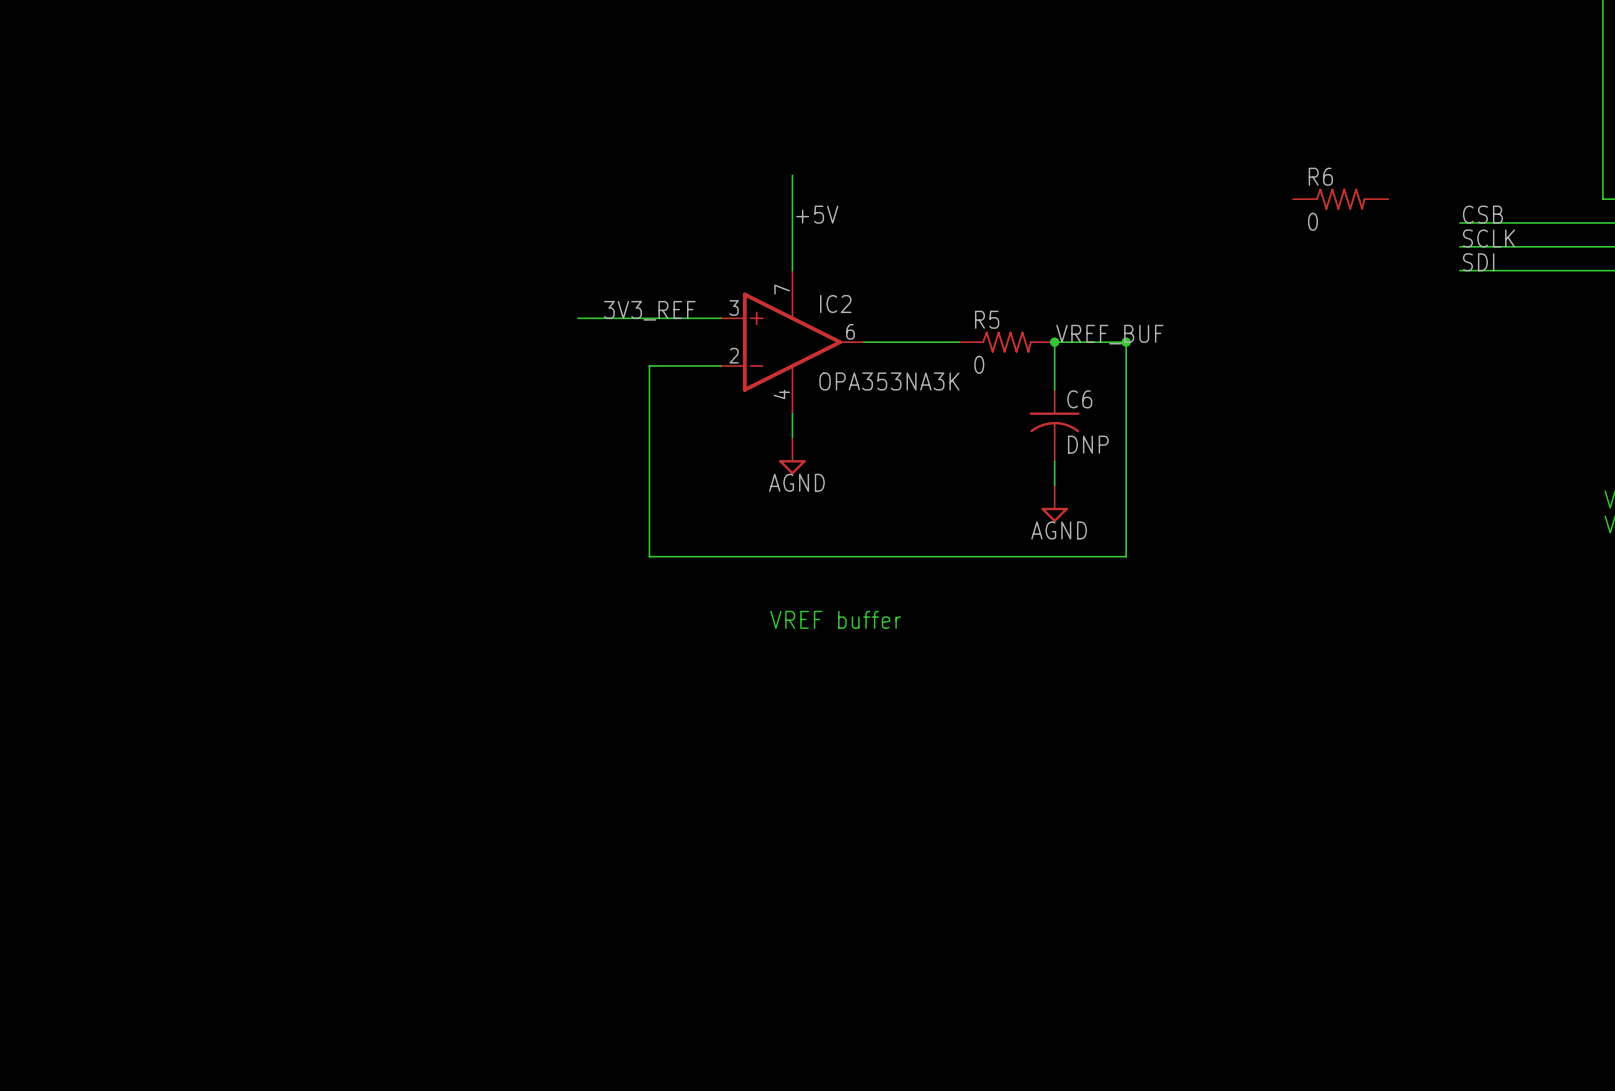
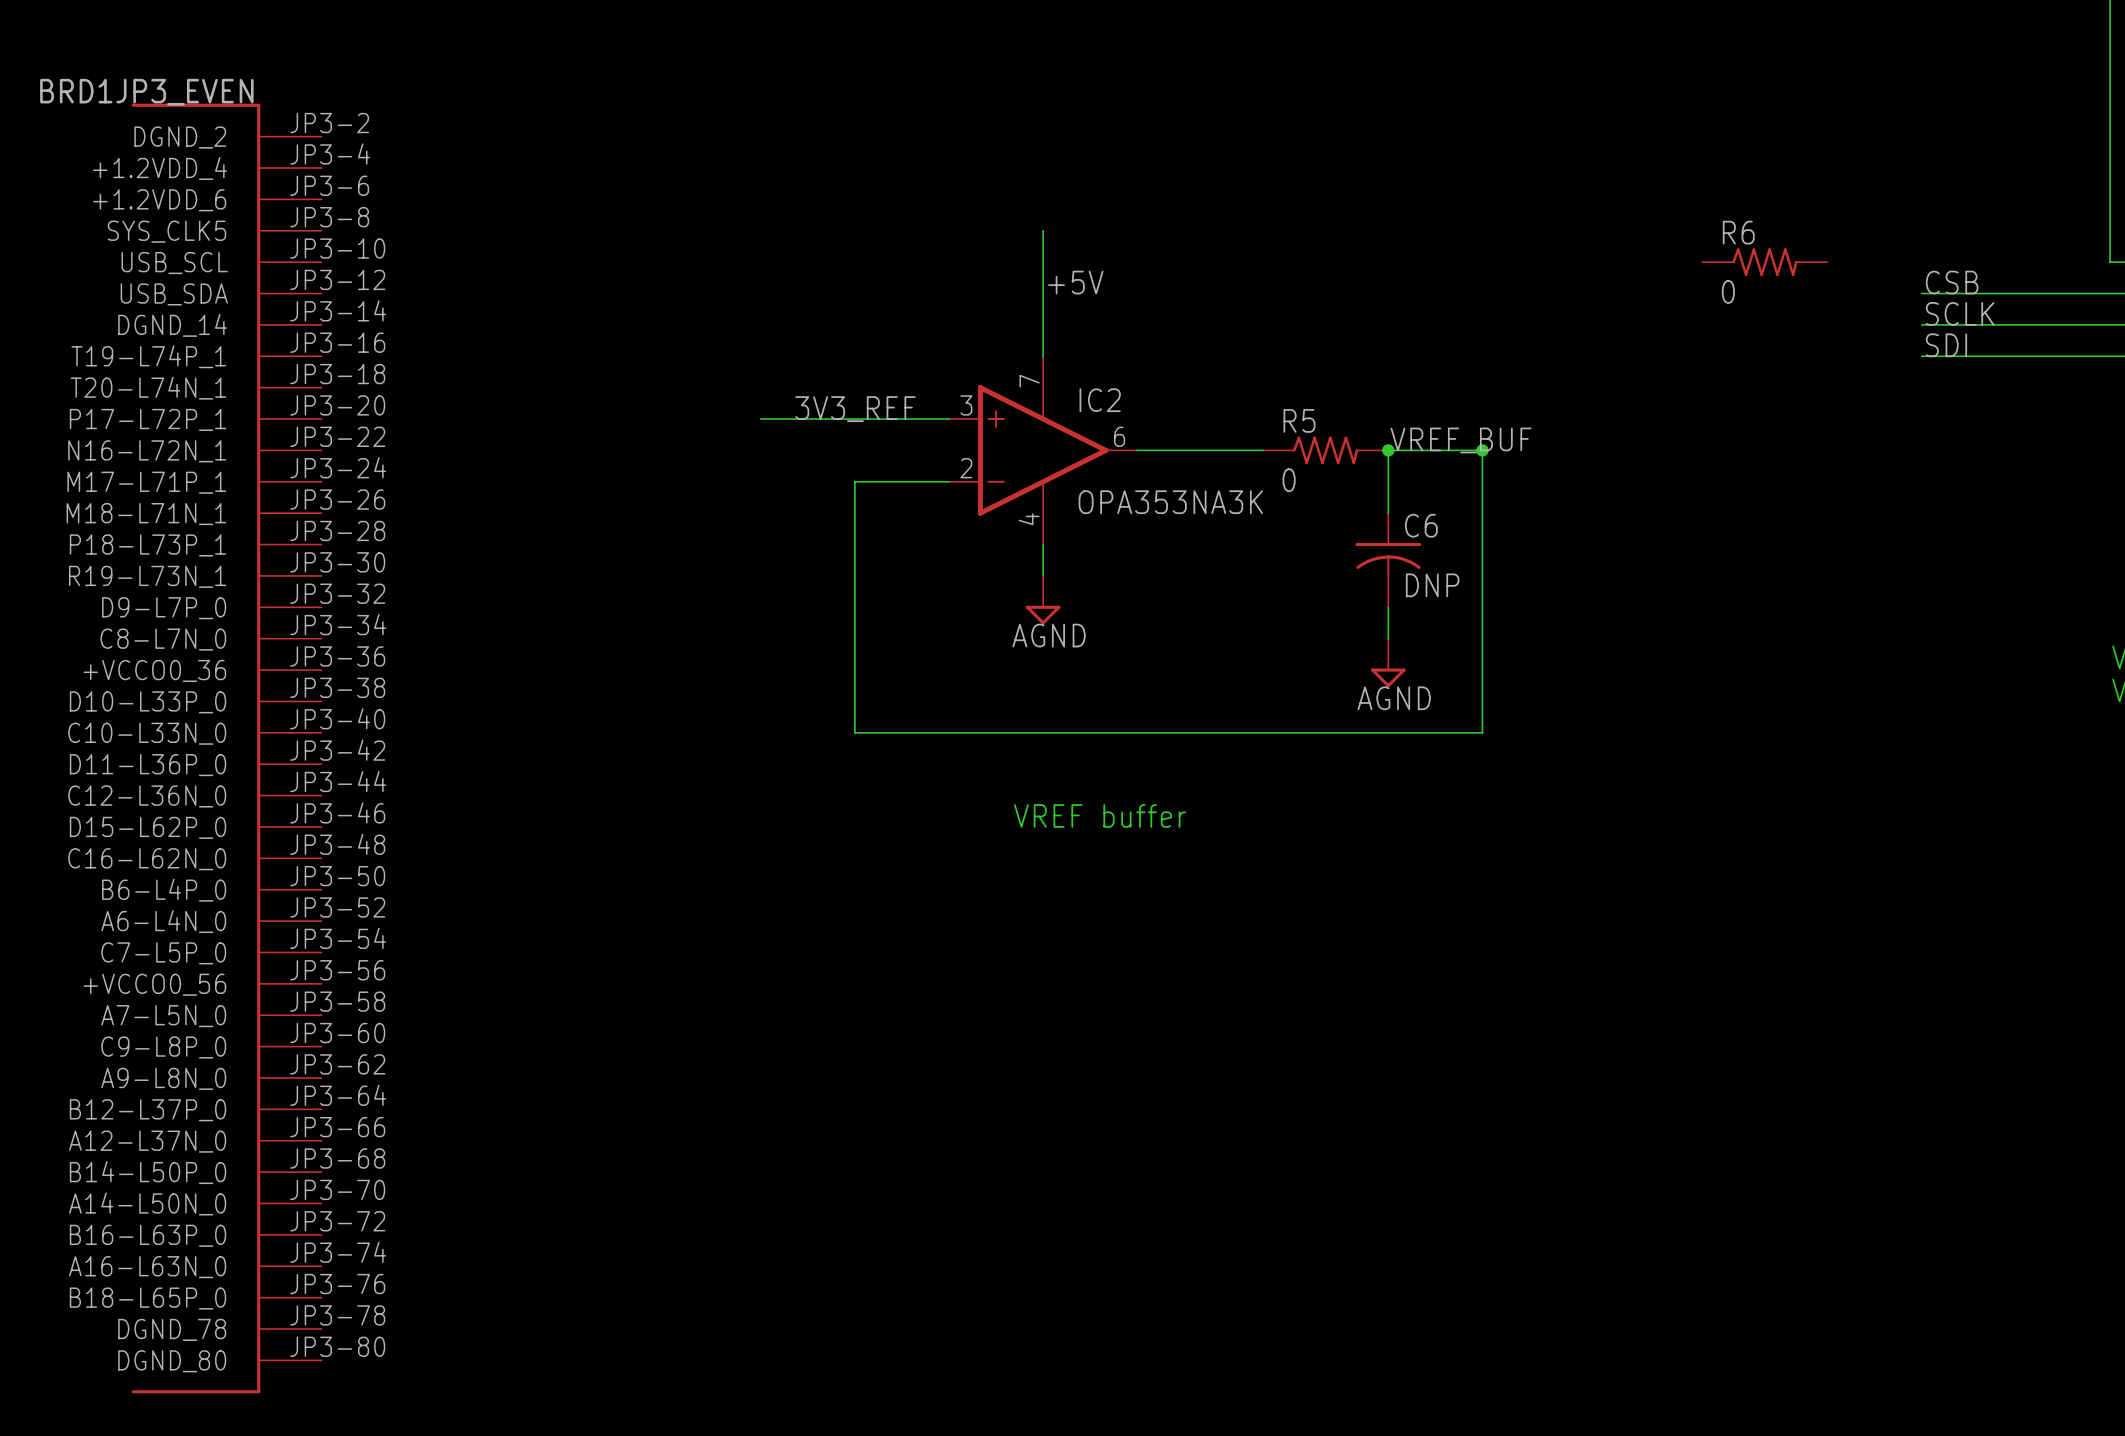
BRD1JP3_EVEN: none -> (226, 748)

